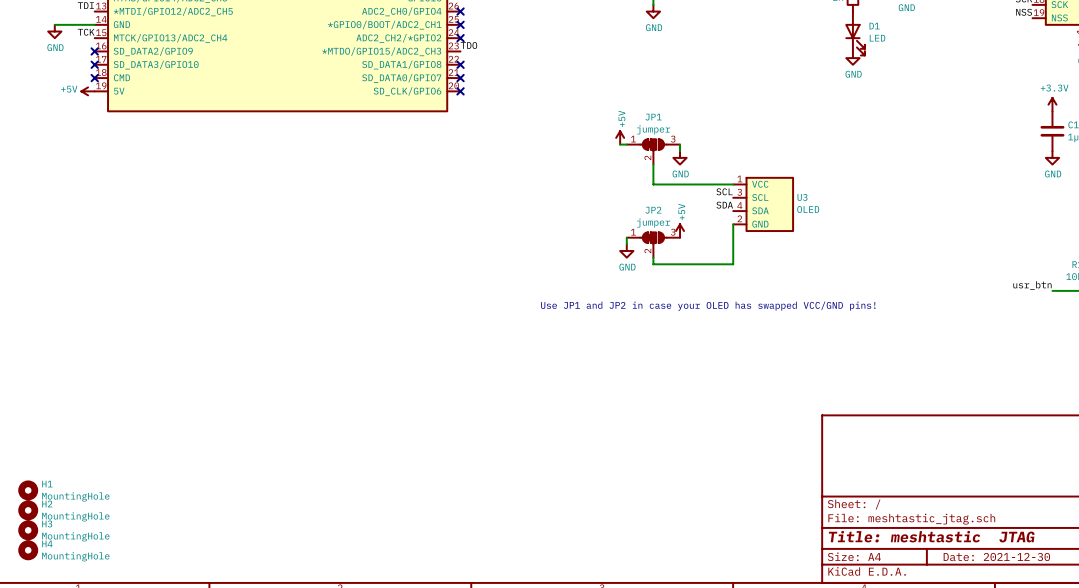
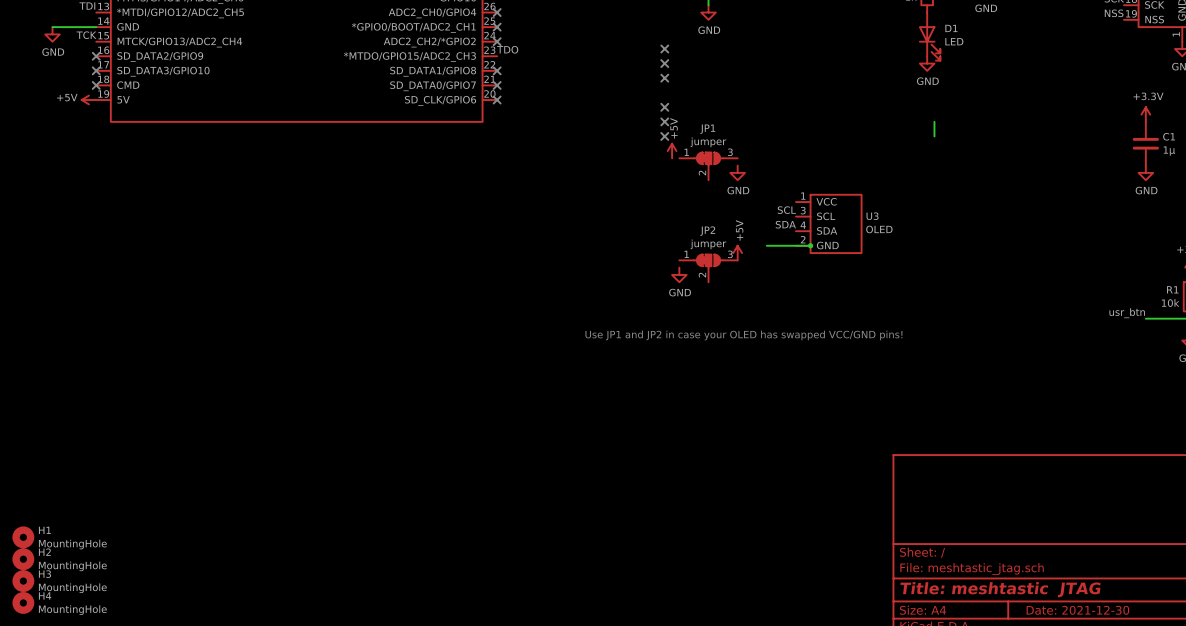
no-connect mark: none -> (664, 48)
no-connect mark: none -> (664, 63)
no-connect mark: none -> (664, 78)
no-connect mark: none -> (664, 107)
no-connect mark: none -> (664, 121)
wire: none -> (934, 121) (934, 136)
no-connect mark: none -> (664, 136)
wire: (620, 144) (626, 144) -> none
wire: (680, 144) (680, 151) -> none
wire: (653, 164) (653, 184) (733, 184) -> none
wire: none -> (766, 245) (810, 245)
wire: (733, 224) (733, 264) (653, 264) (653, 257) -> none
junction: none -> (810, 245)
wire: (626, 237) (626, 244) -> none

